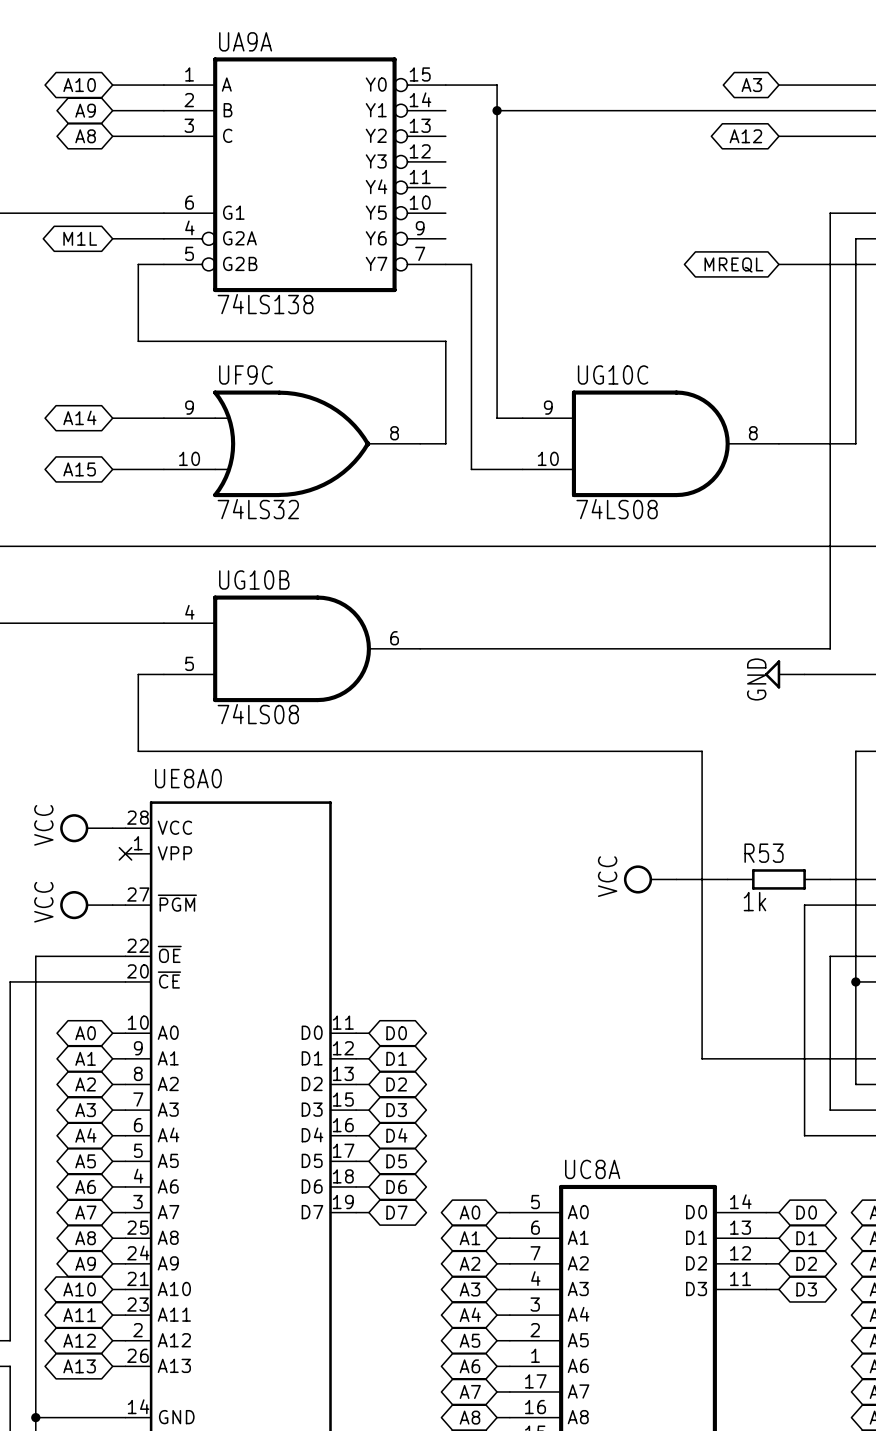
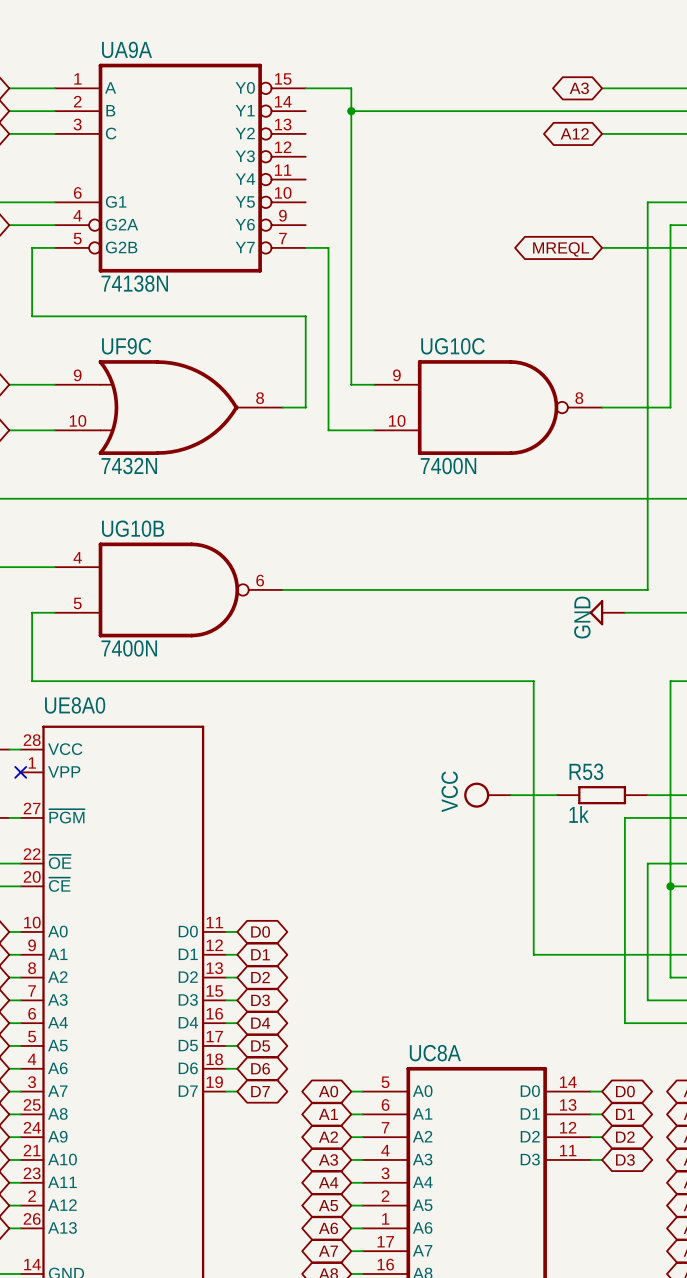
UA9A value: 74LS138 (265, 304) -> 74138N (134, 283)
UG10C symbol: [522, 390, 779, 498] -> [374, 360, 603, 455]
UF9C value: 74LS32 (258, 509) -> 7432N (129, 466)
UG10C value: 74LS08 (617, 509) -> 7400N (448, 466)
UG10B symbol: [163, 595, 421, 703] -> [54, 542, 283, 638]
UG10B value: 74LS08 (258, 714) -> 7400N (129, 648)

